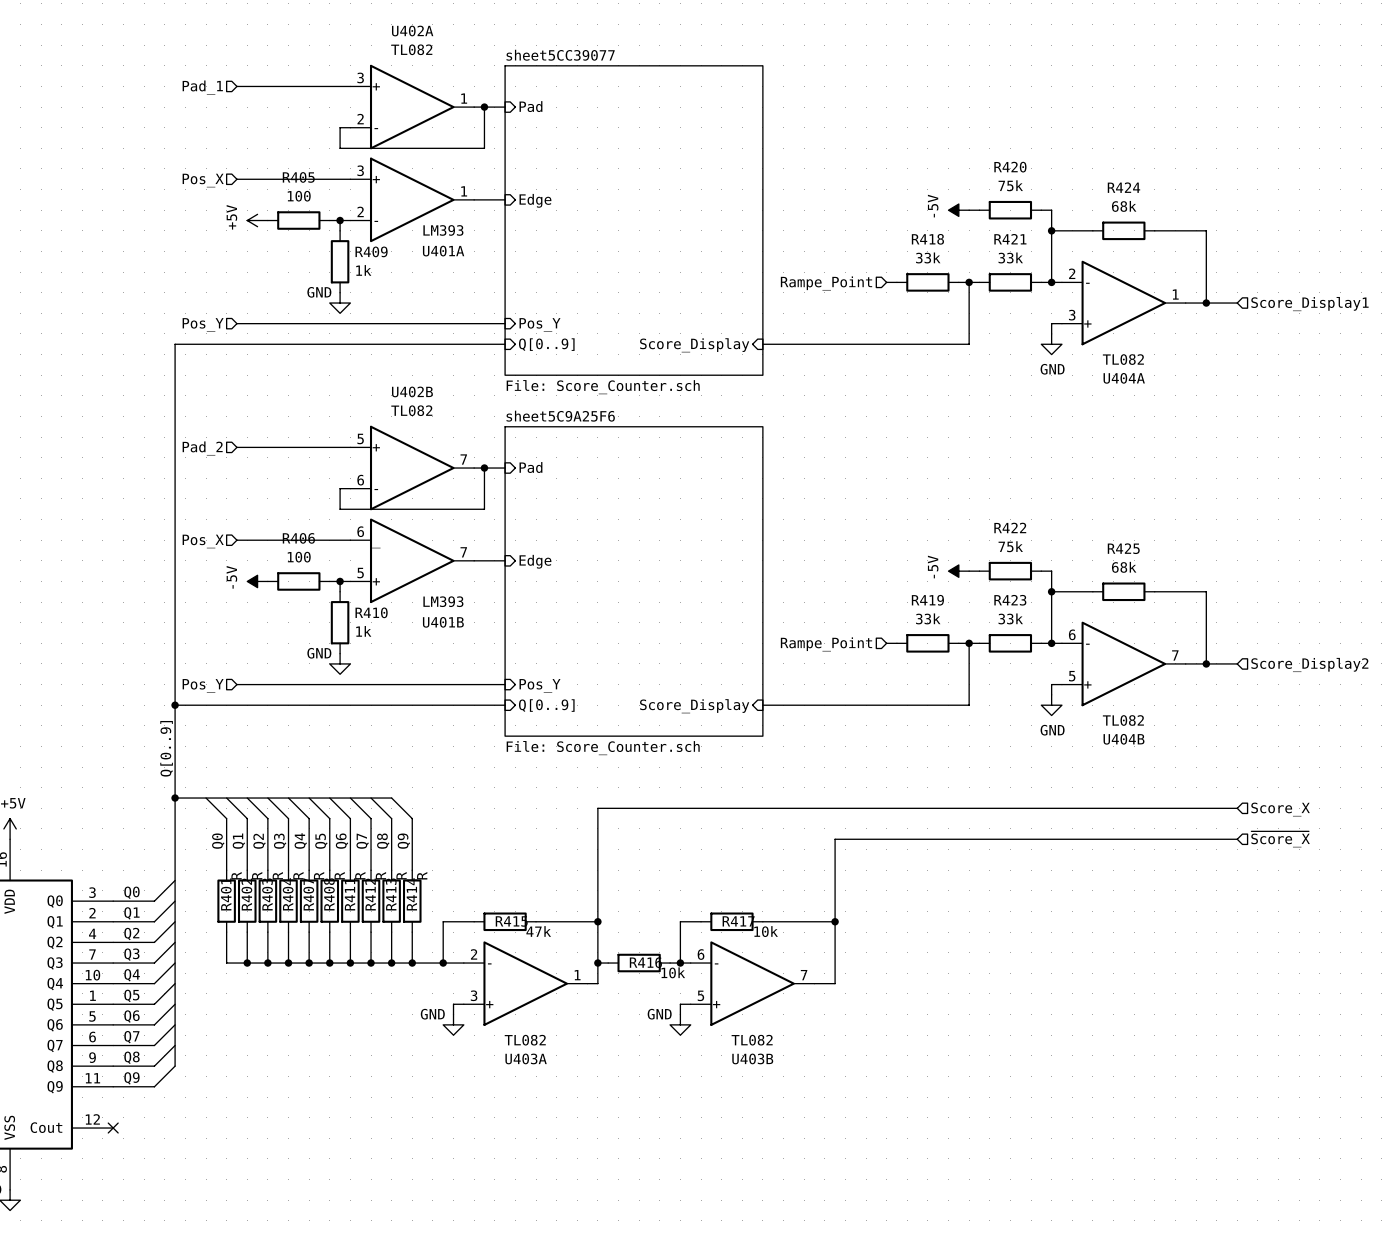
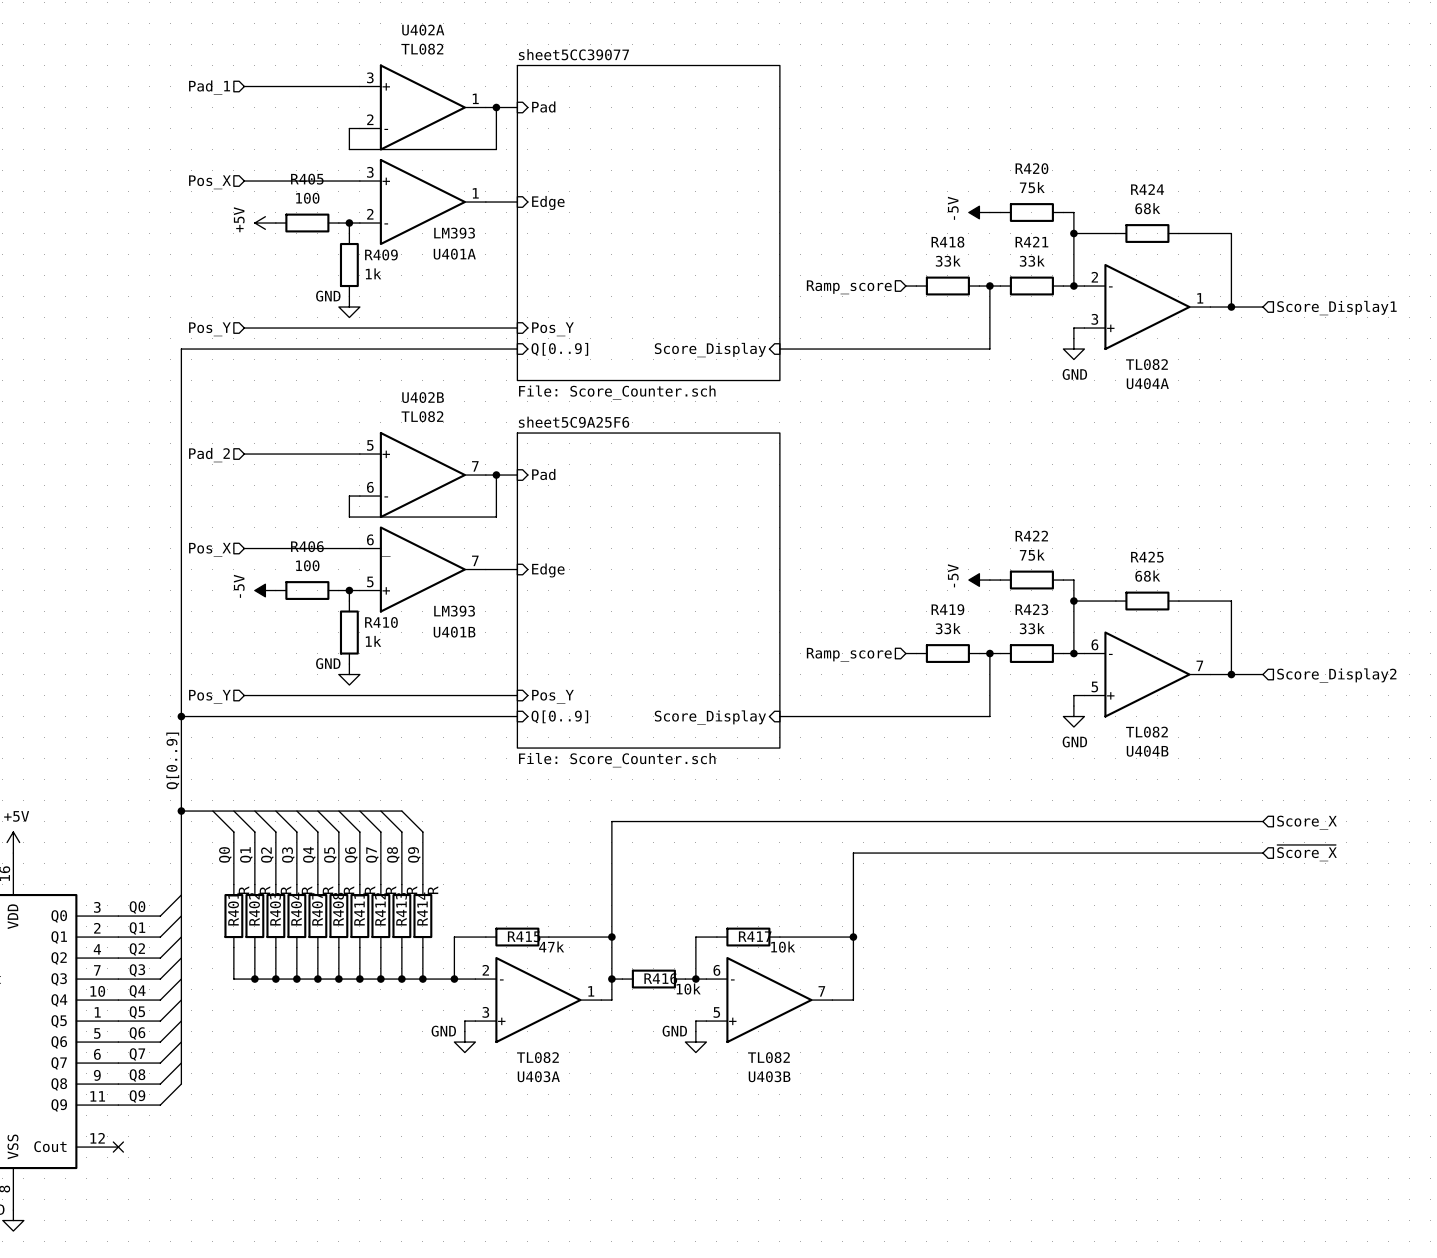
hierarchical label: Rampe_Point (826, 283) -> Ramp_score (849, 287)
hierarchical label: Rampe_Point (826, 644) -> Ramp_score (849, 654)

